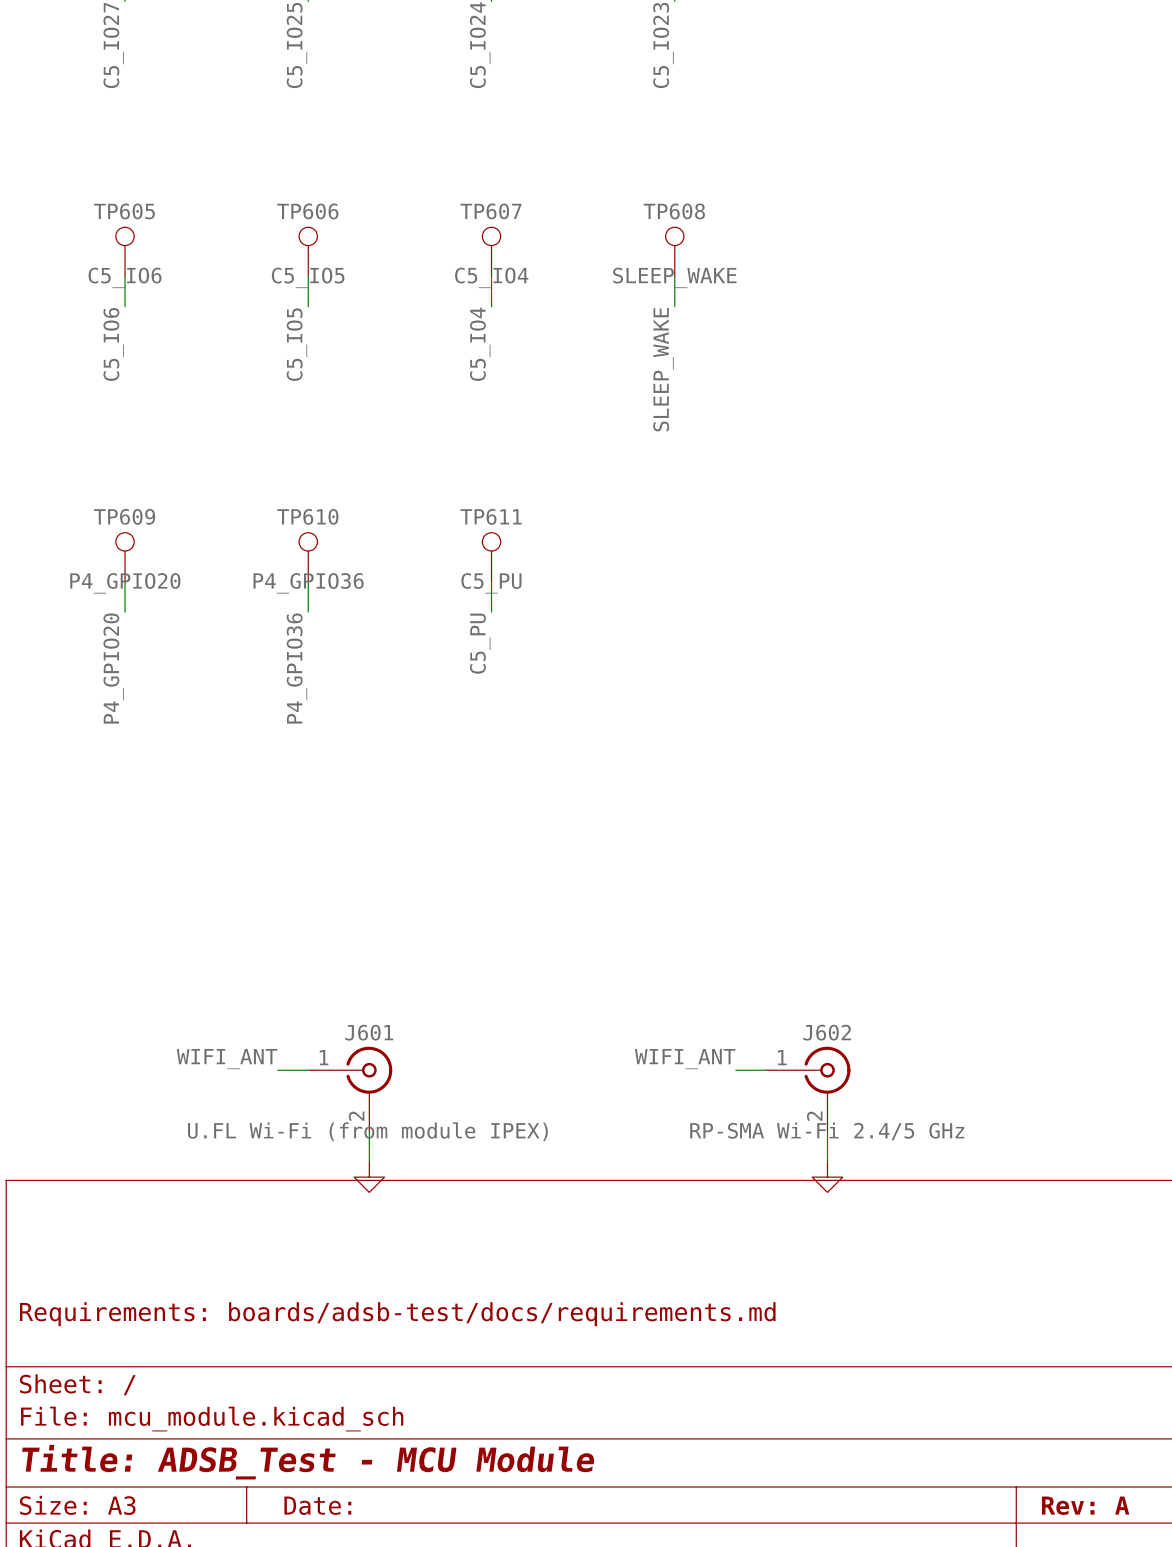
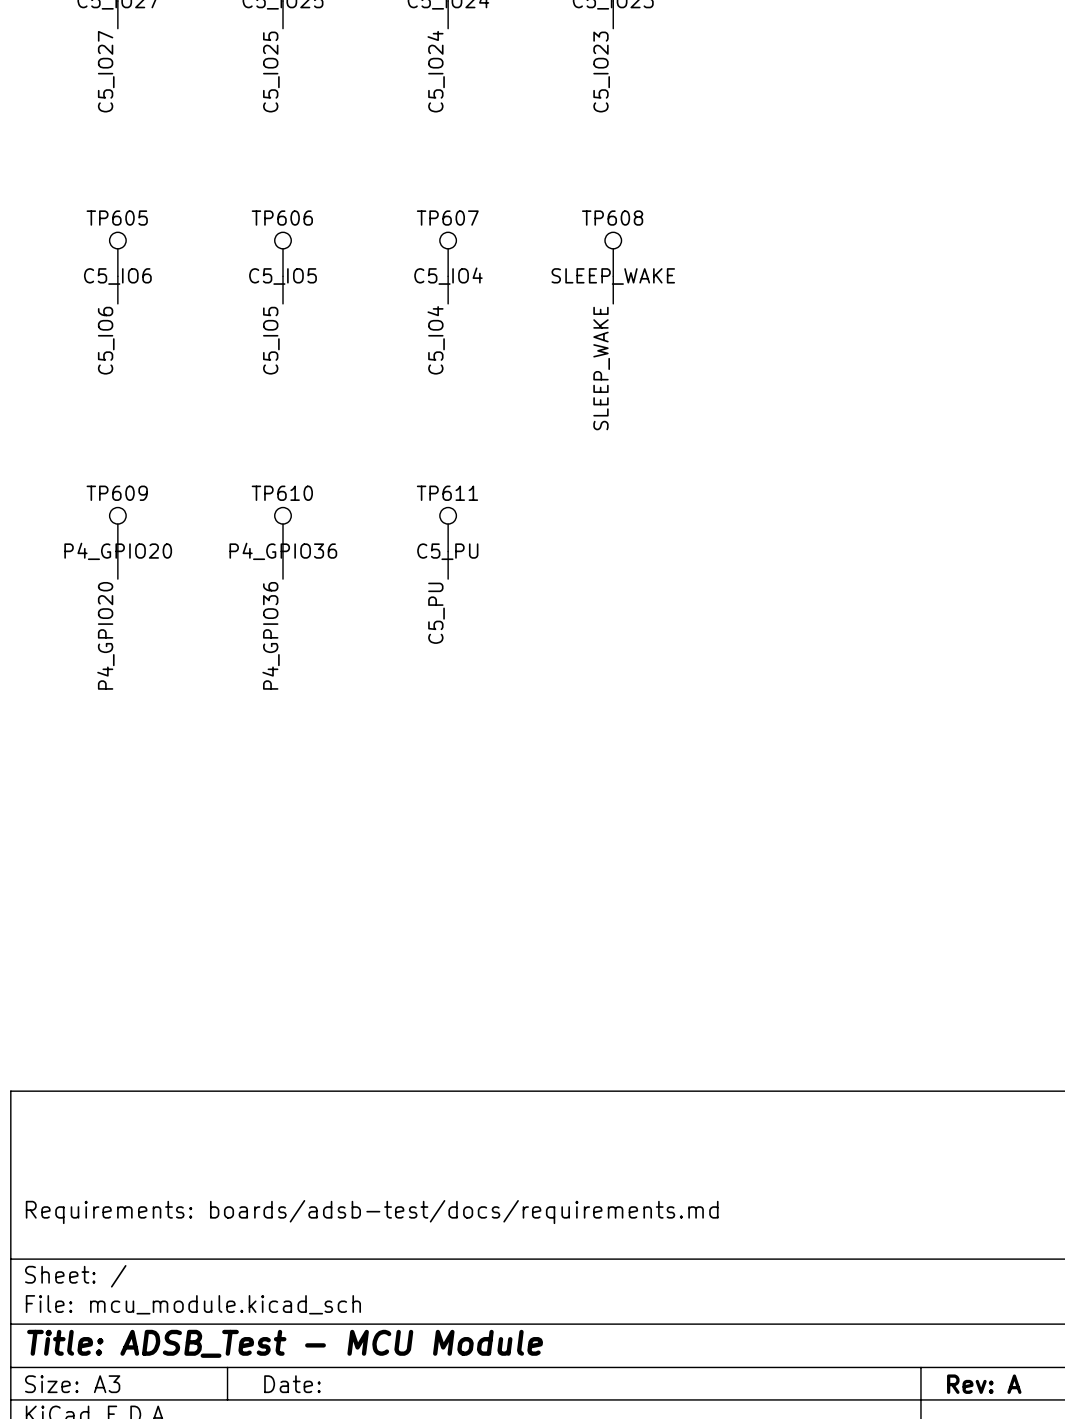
label: WIFI_ANT (227, 1059) -> none
label: WIFI_ANT (685, 1059) -> none
wire: (277, 1070) (308, 1070) -> none
wire: (735, 1070) (766, 1070) -> none
J601: U.FL Wi-Fi (from module IPEX) (350, 1089) -> none
J602: RP-SMA Wi-Fi 2.4/5 GHz (808, 1089) -> none
wire: (369, 1131) (369, 1161) -> none
wire: (827, 1131) (827, 1161) -> none
power symbol: (369, 1177) -> none
power symbol: (827, 1177) -> none

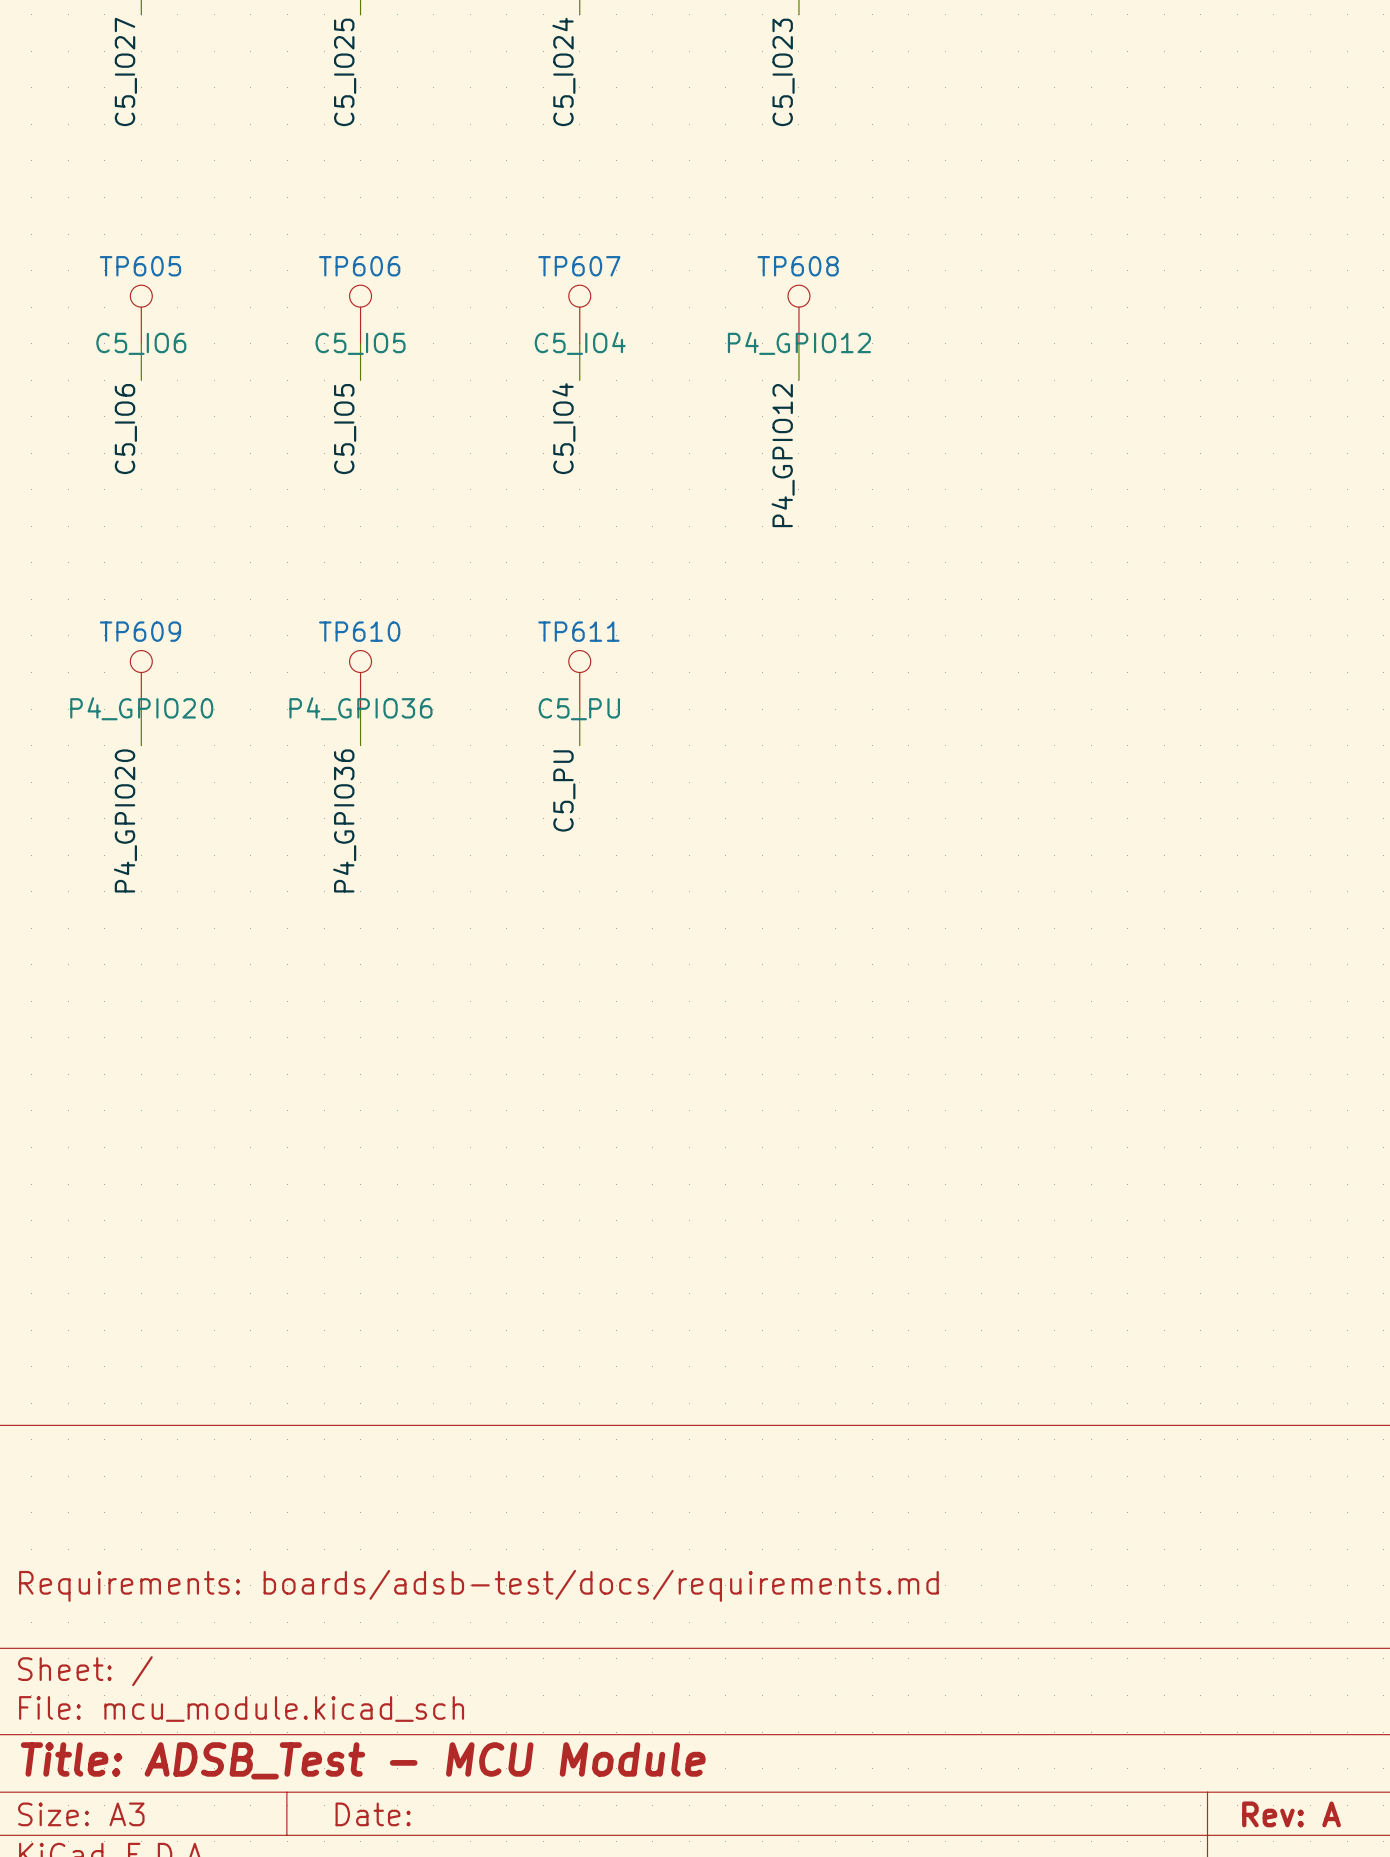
TP608 value: SLEEP_WAKE (613, 276) -> P4_GPIO12 (799, 343)
label: SLEEP_WAKE (601, 368) -> P4_GPIO12 (783, 455)

